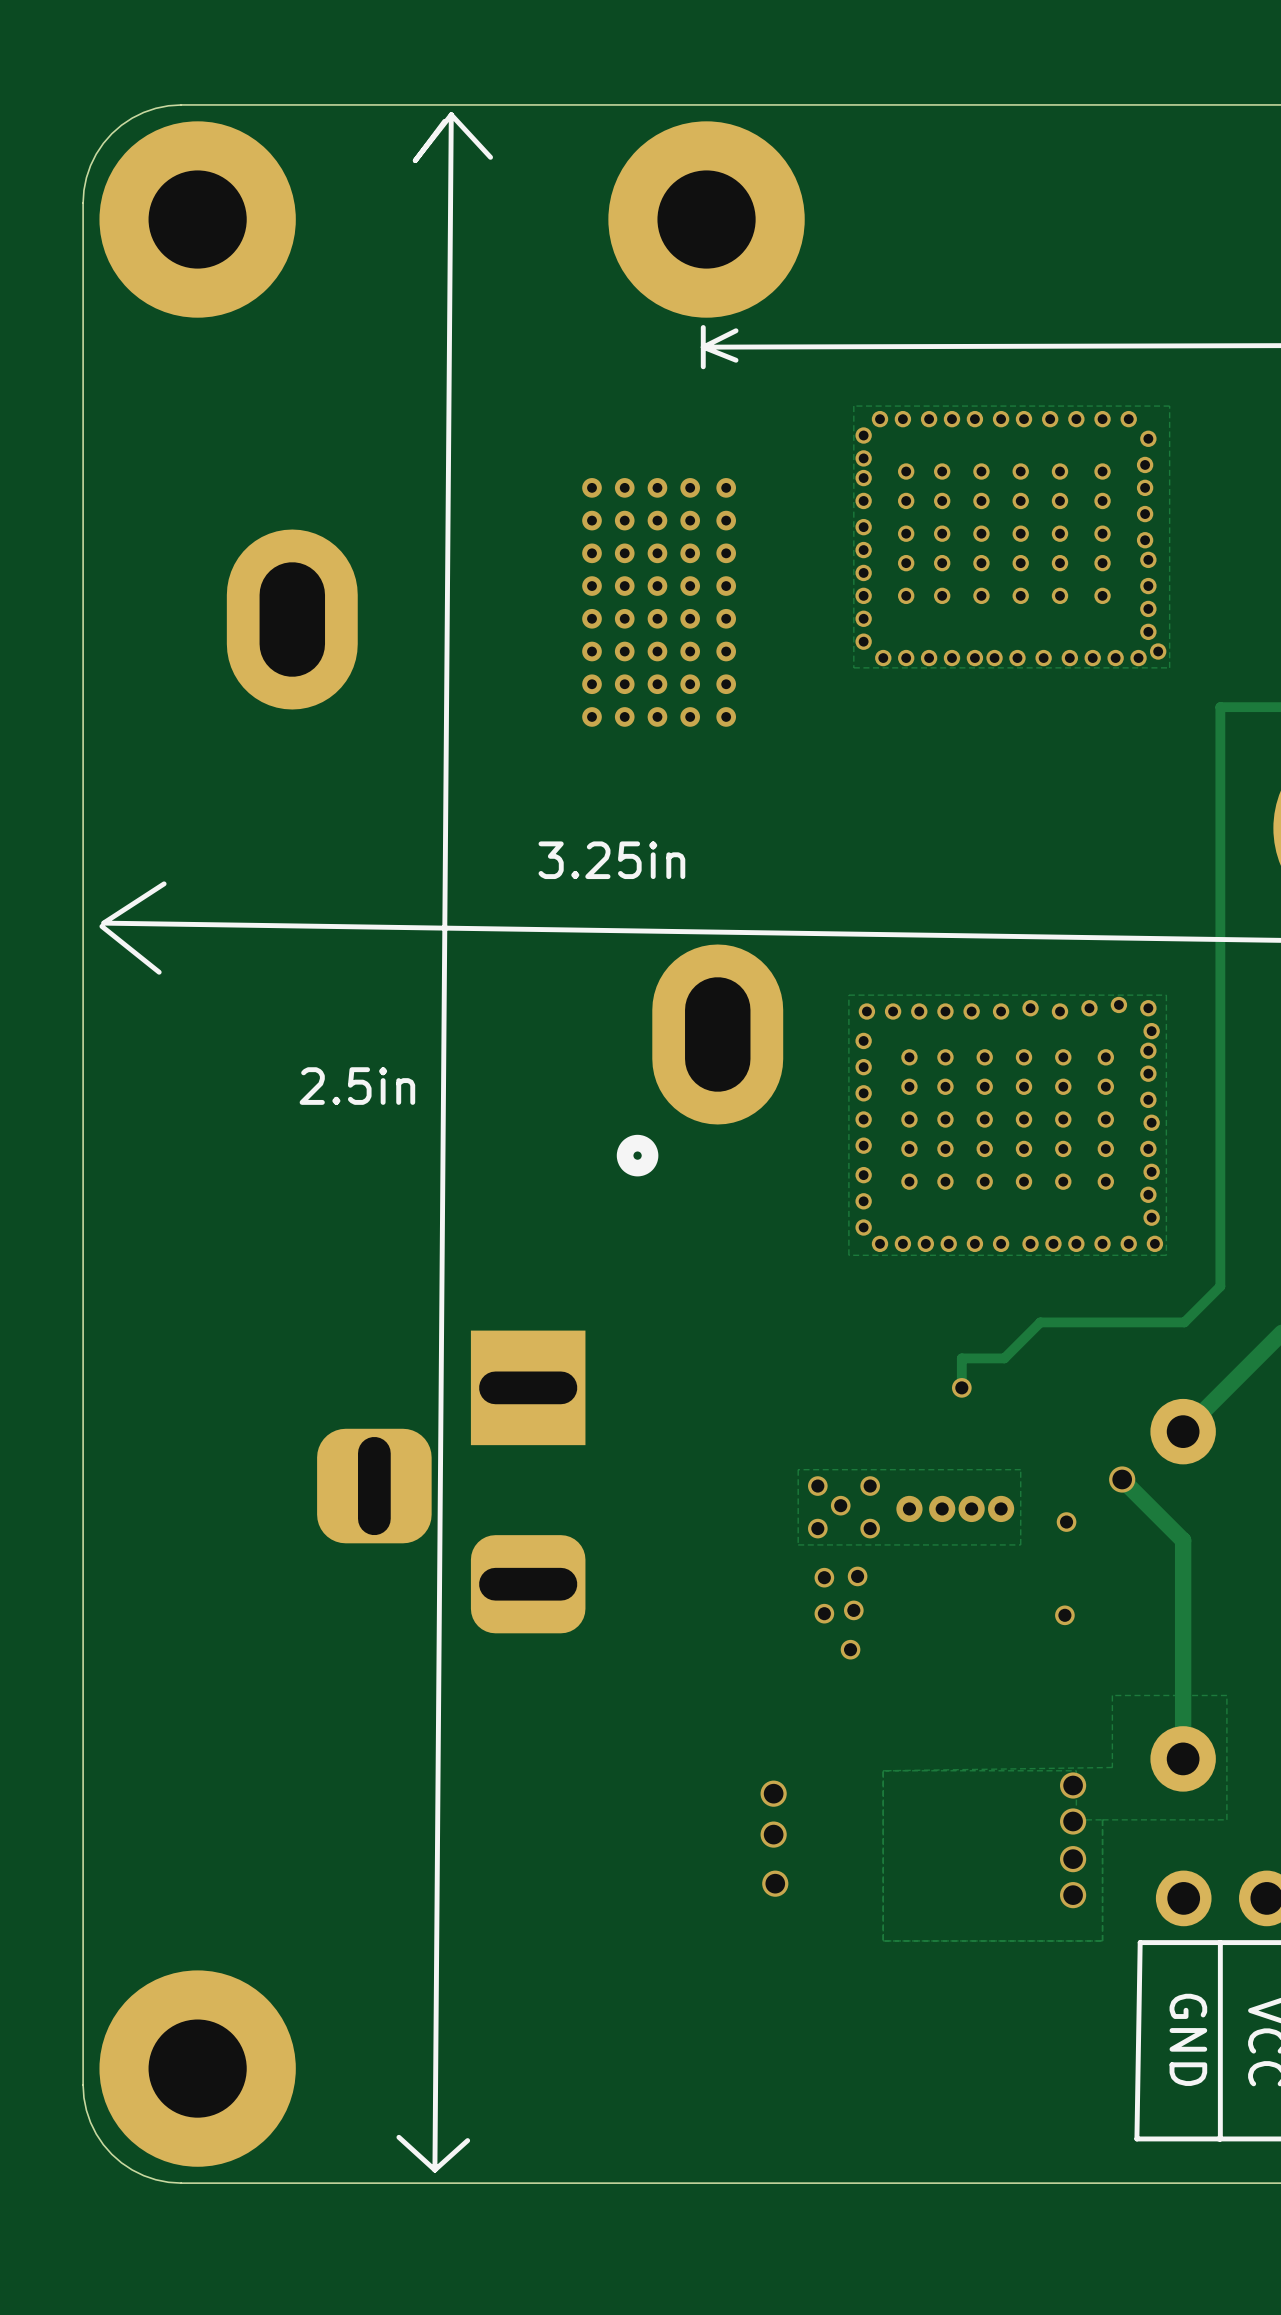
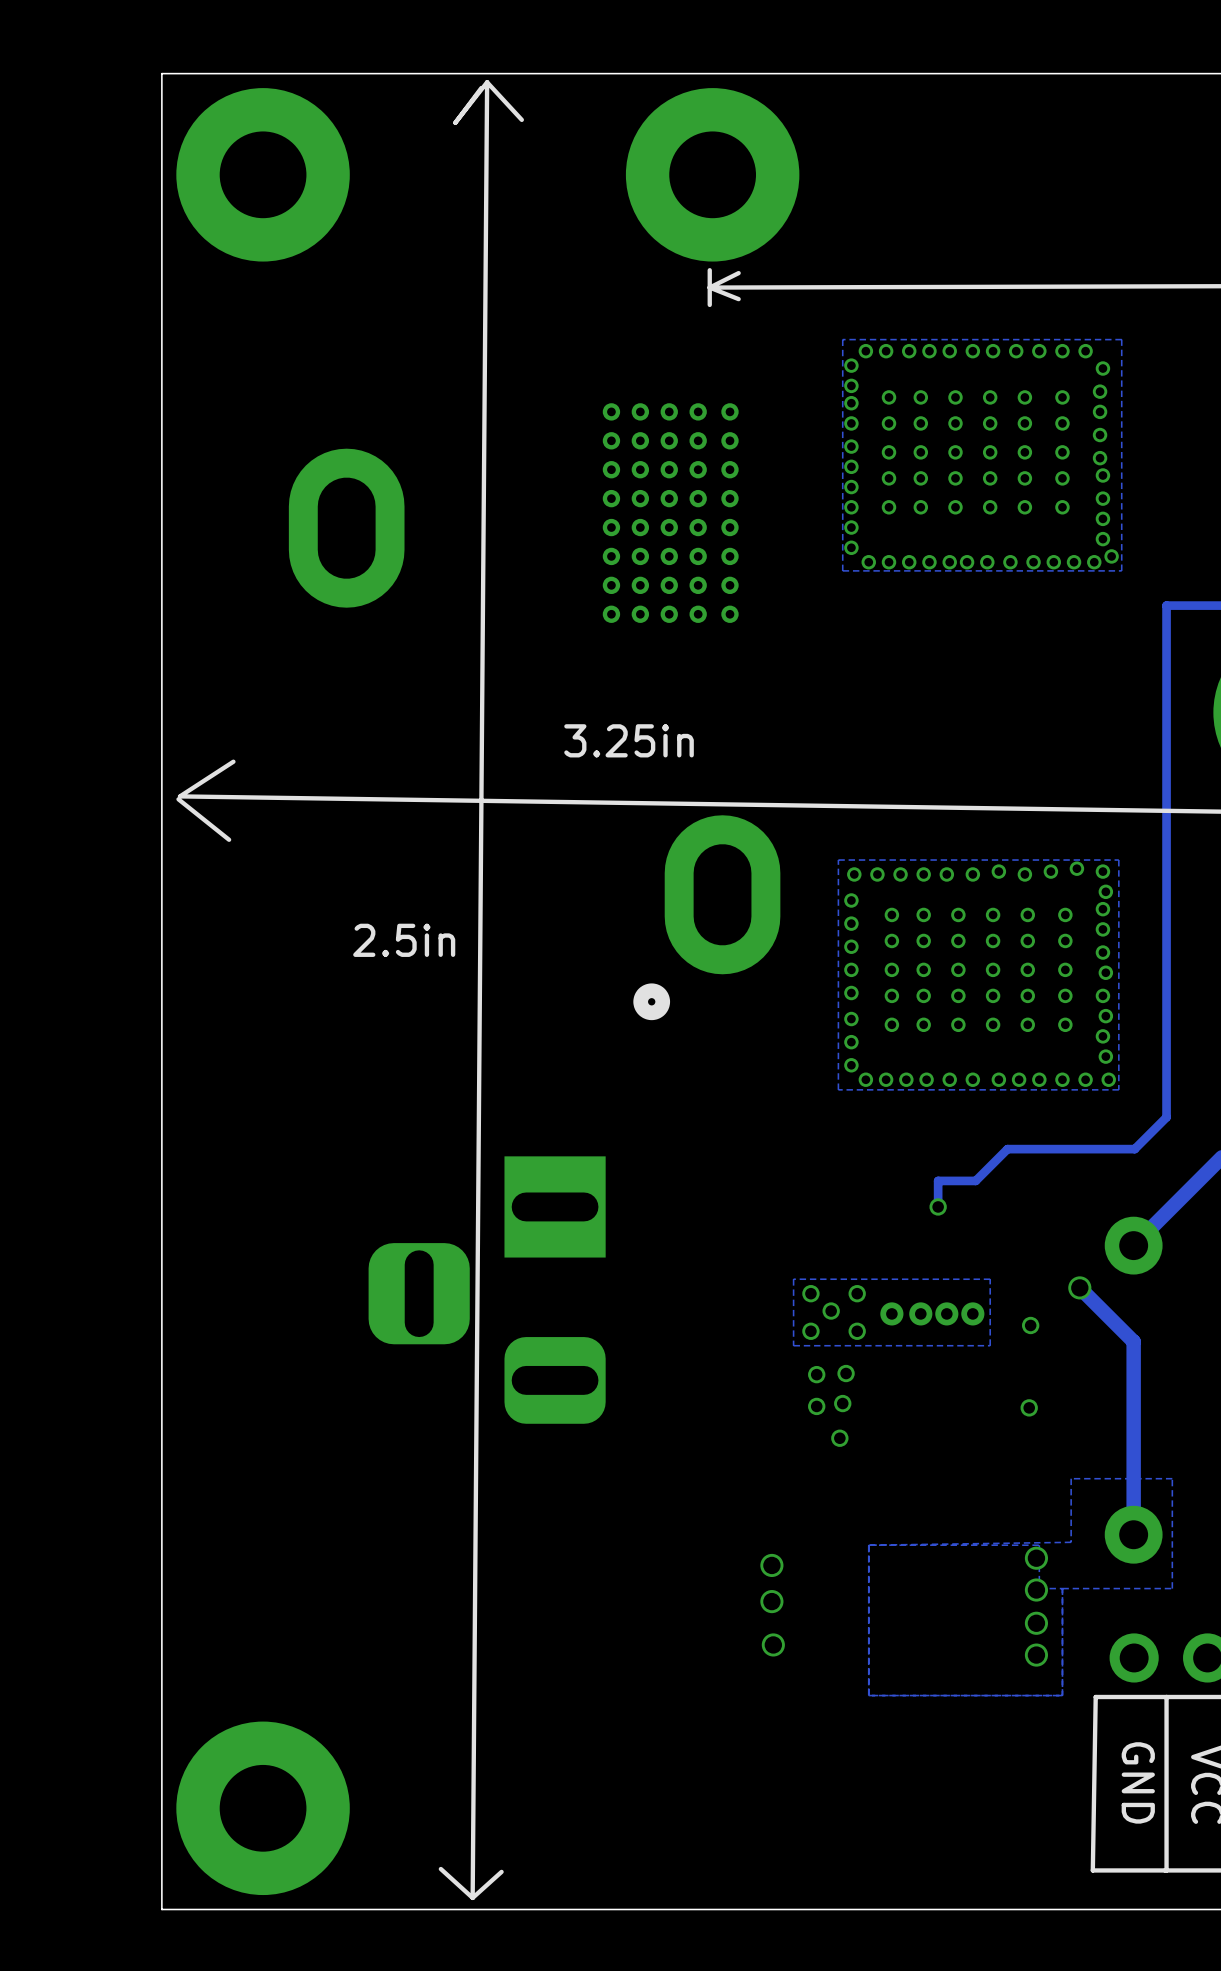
board edge: (181, 104) (155, 108) (143, 112) (121, 125) (111, 133) (103, 143) (90, 165) (86, 177) (83, 203) -> (248, 73) (161, 73) (161, 160)
board edge: (83, 2084) (86, 2110) (90, 2122) (103, 2144) (111, 2154) (121, 2162) (143, 2175) (168, 2182) (181, 2183) -> (161, 1822) (161, 1909) (248, 1909)

